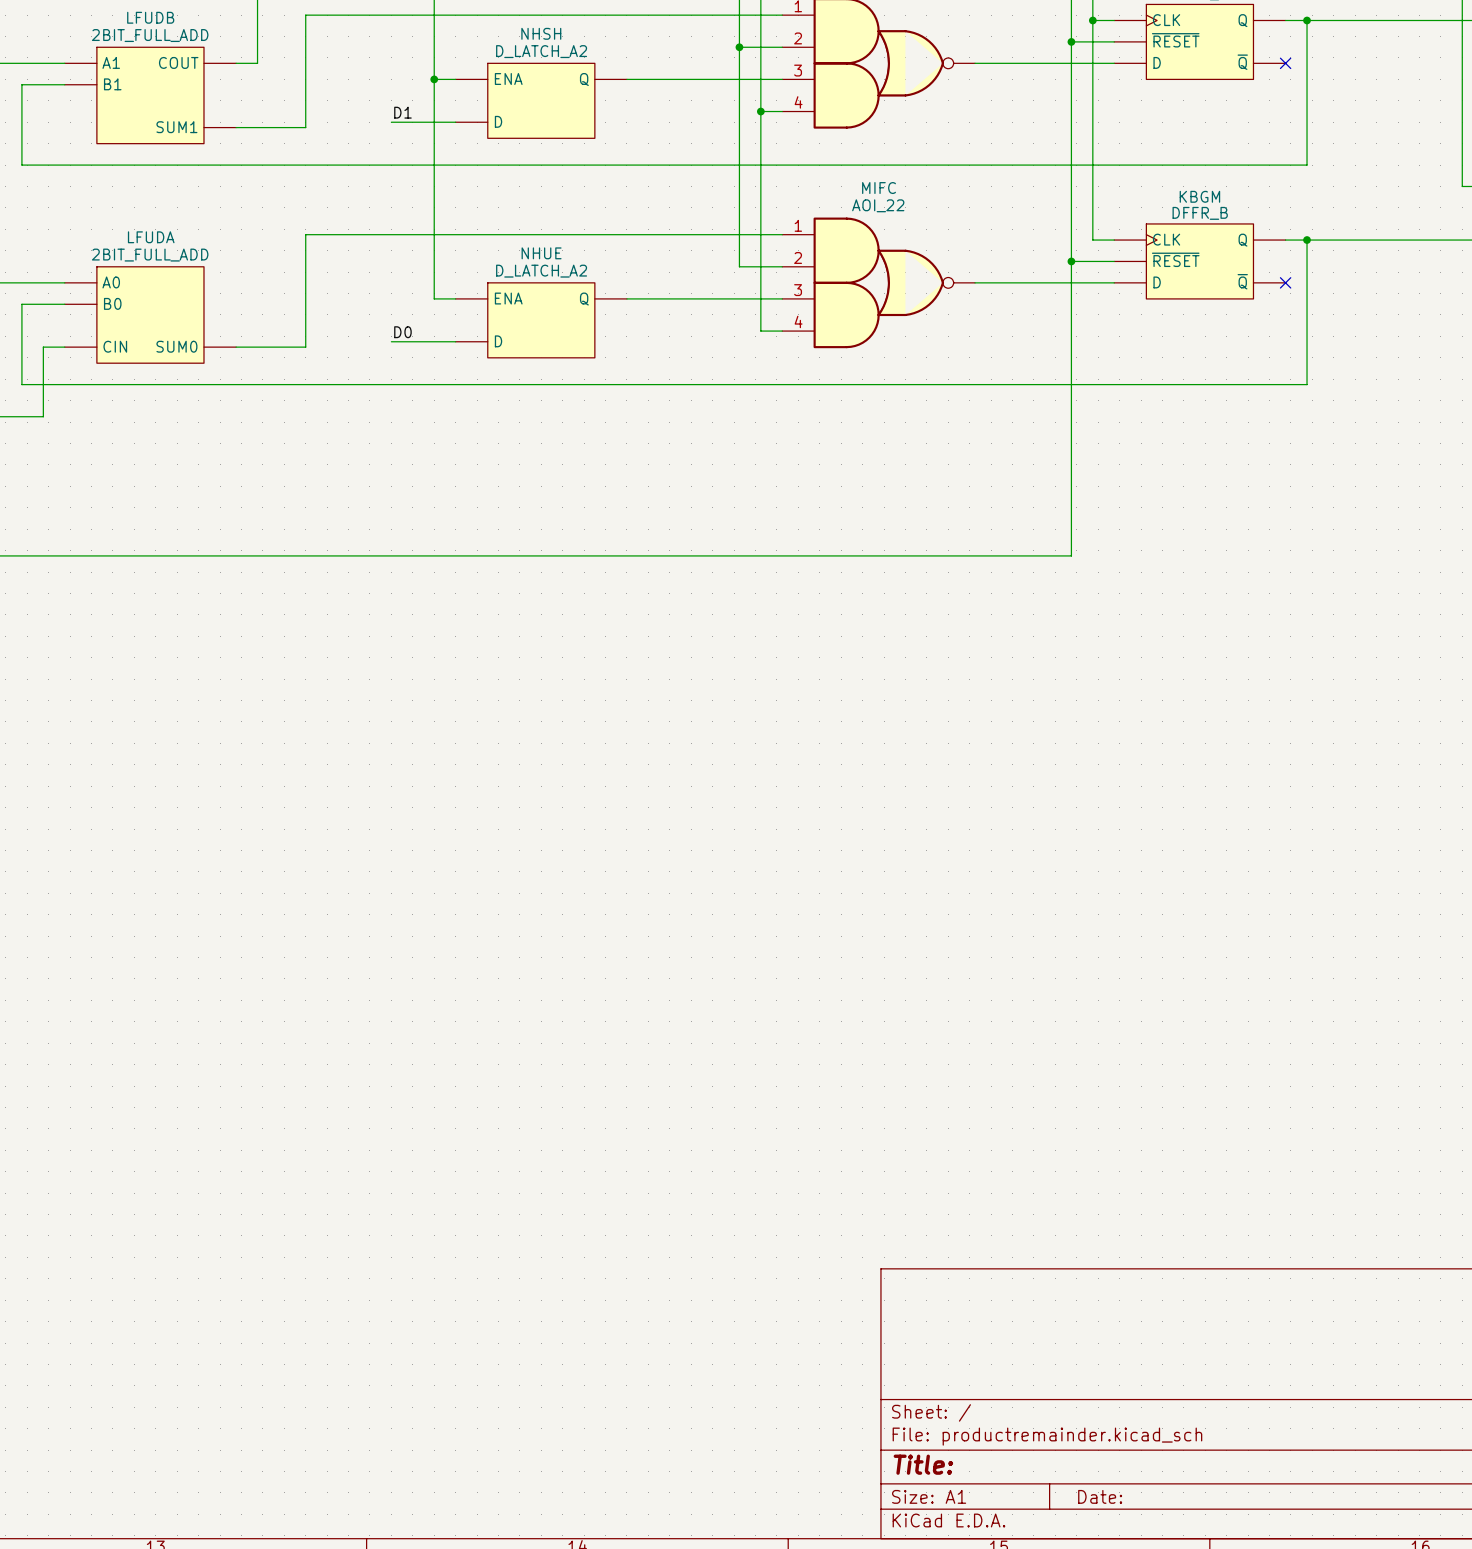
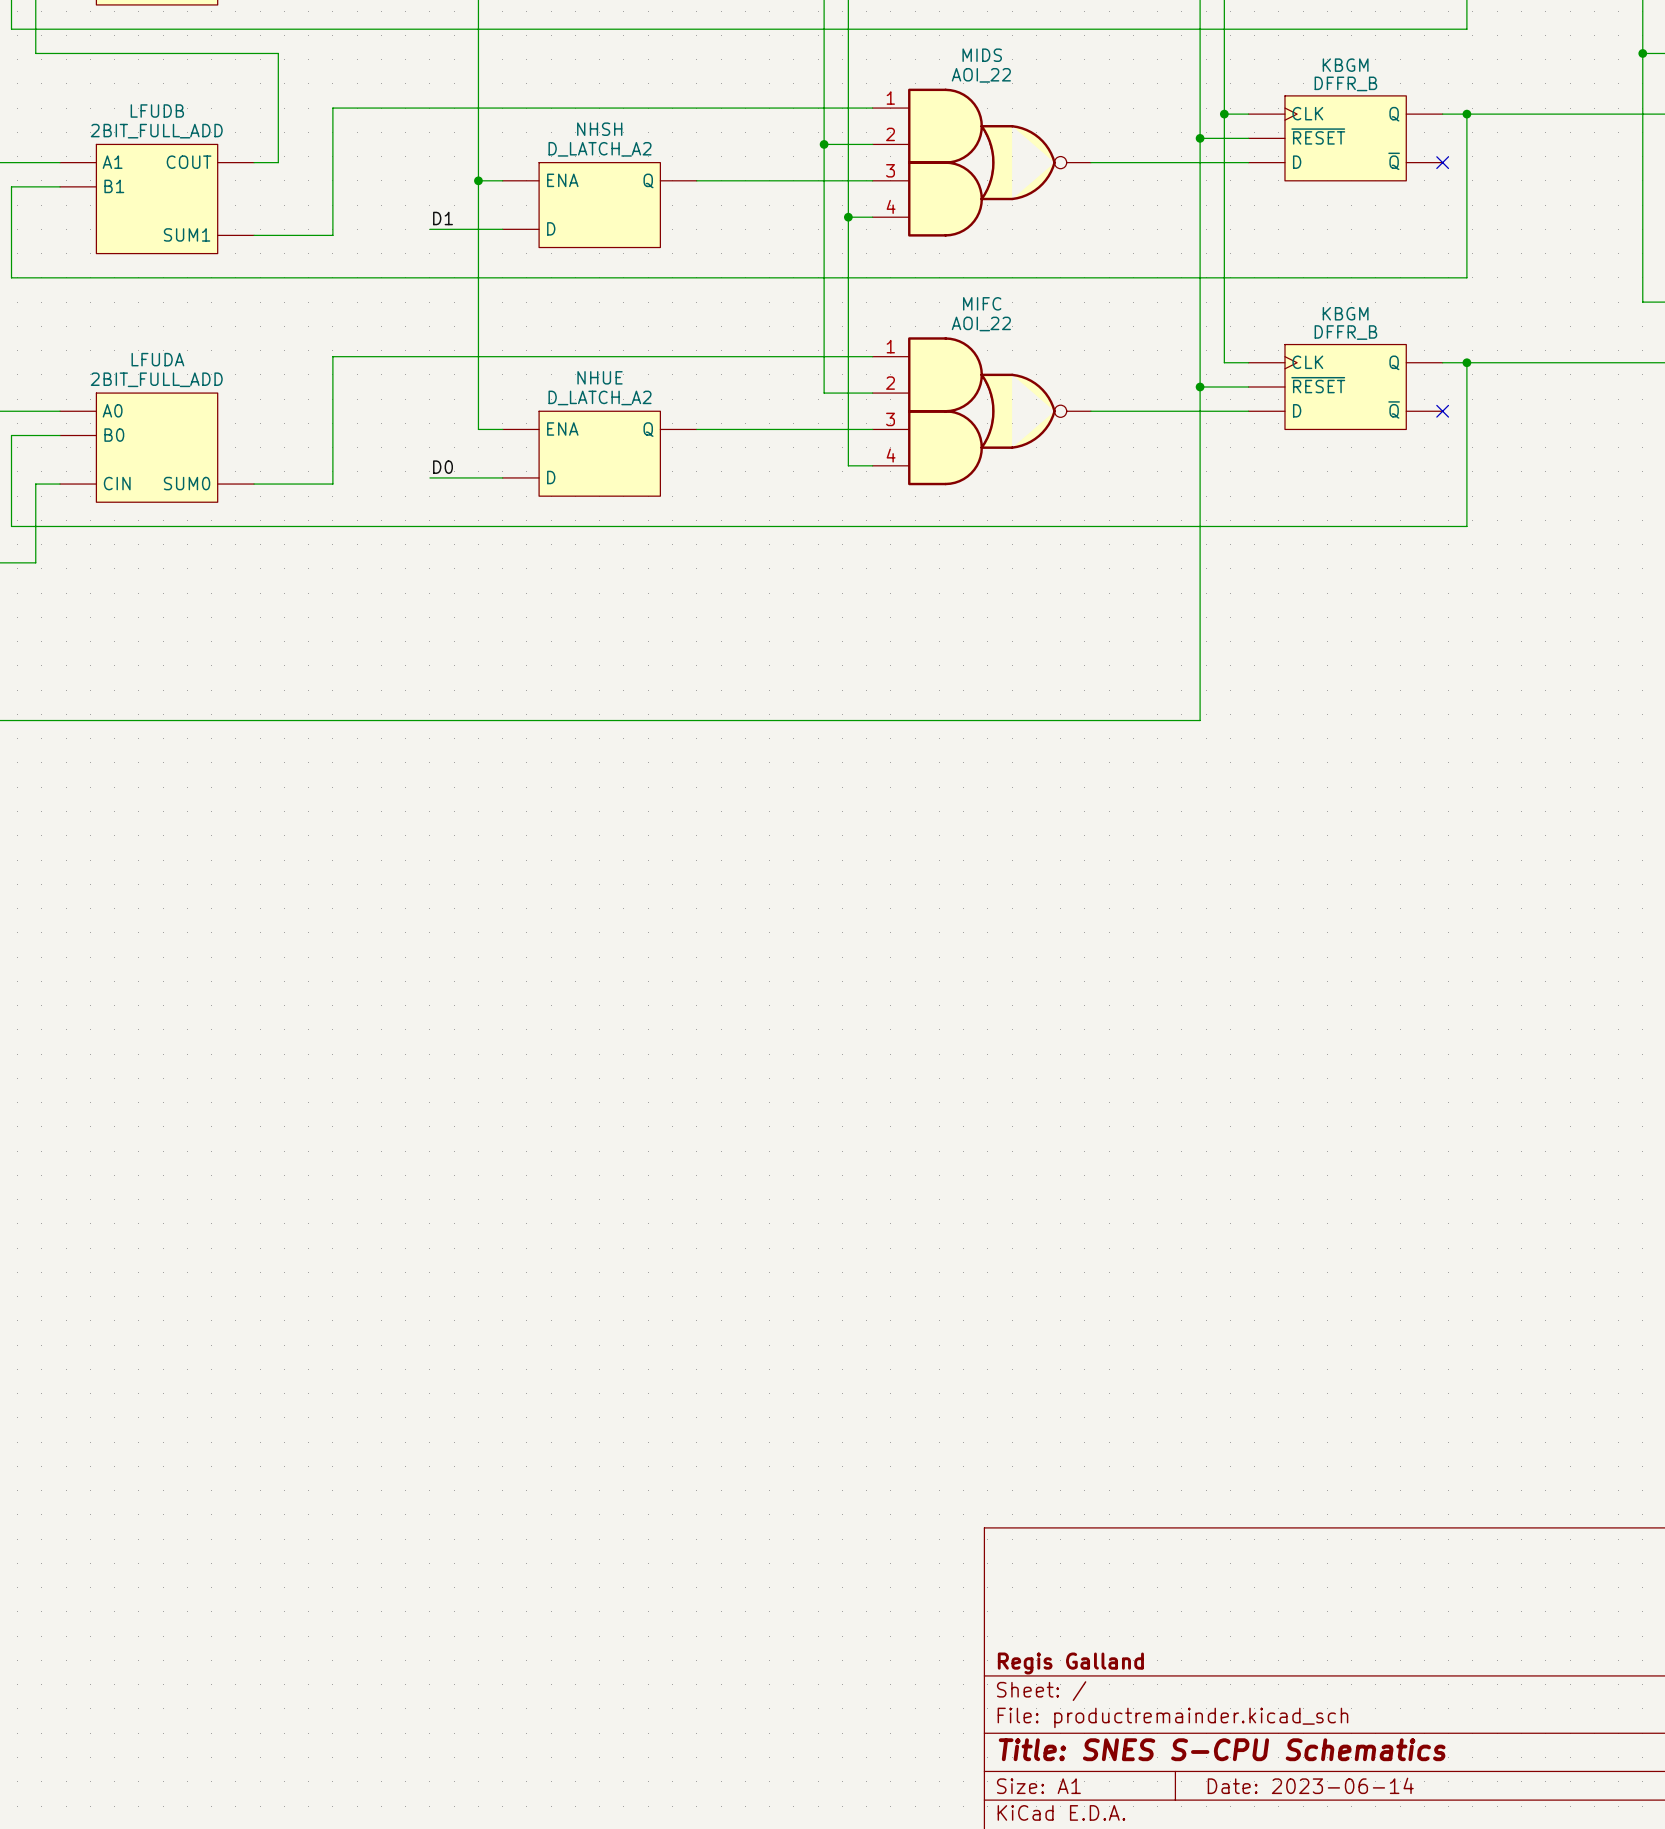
title block: none -> Regis Galland (1070, 1663)
title block: Title: (923, 1464) -> Title: SNES S-CPU Schematics (1222, 1749)
title block: Date: (1100, 1496) -> Date: 2023-06-14 (1310, 1785)

